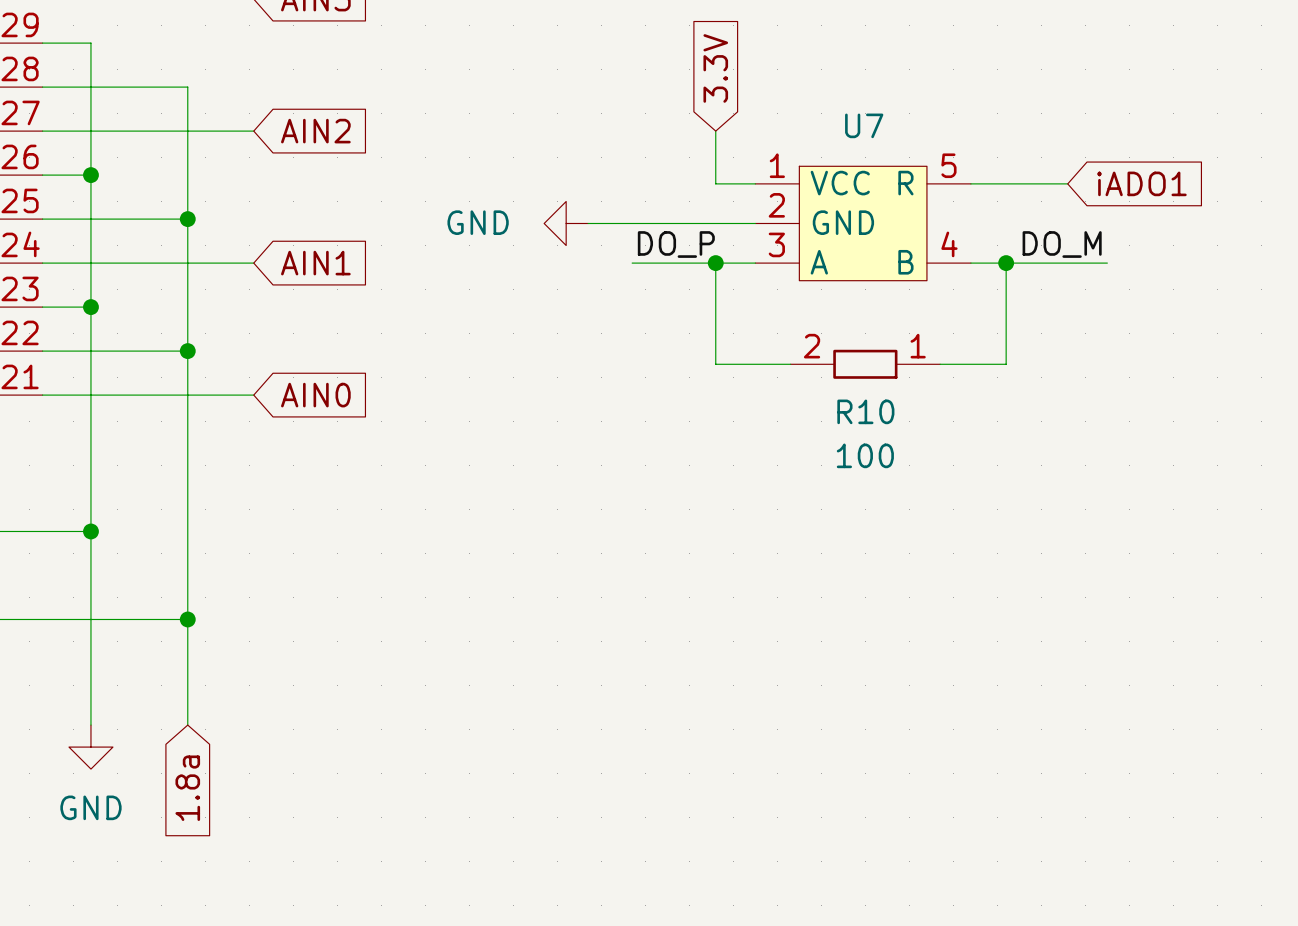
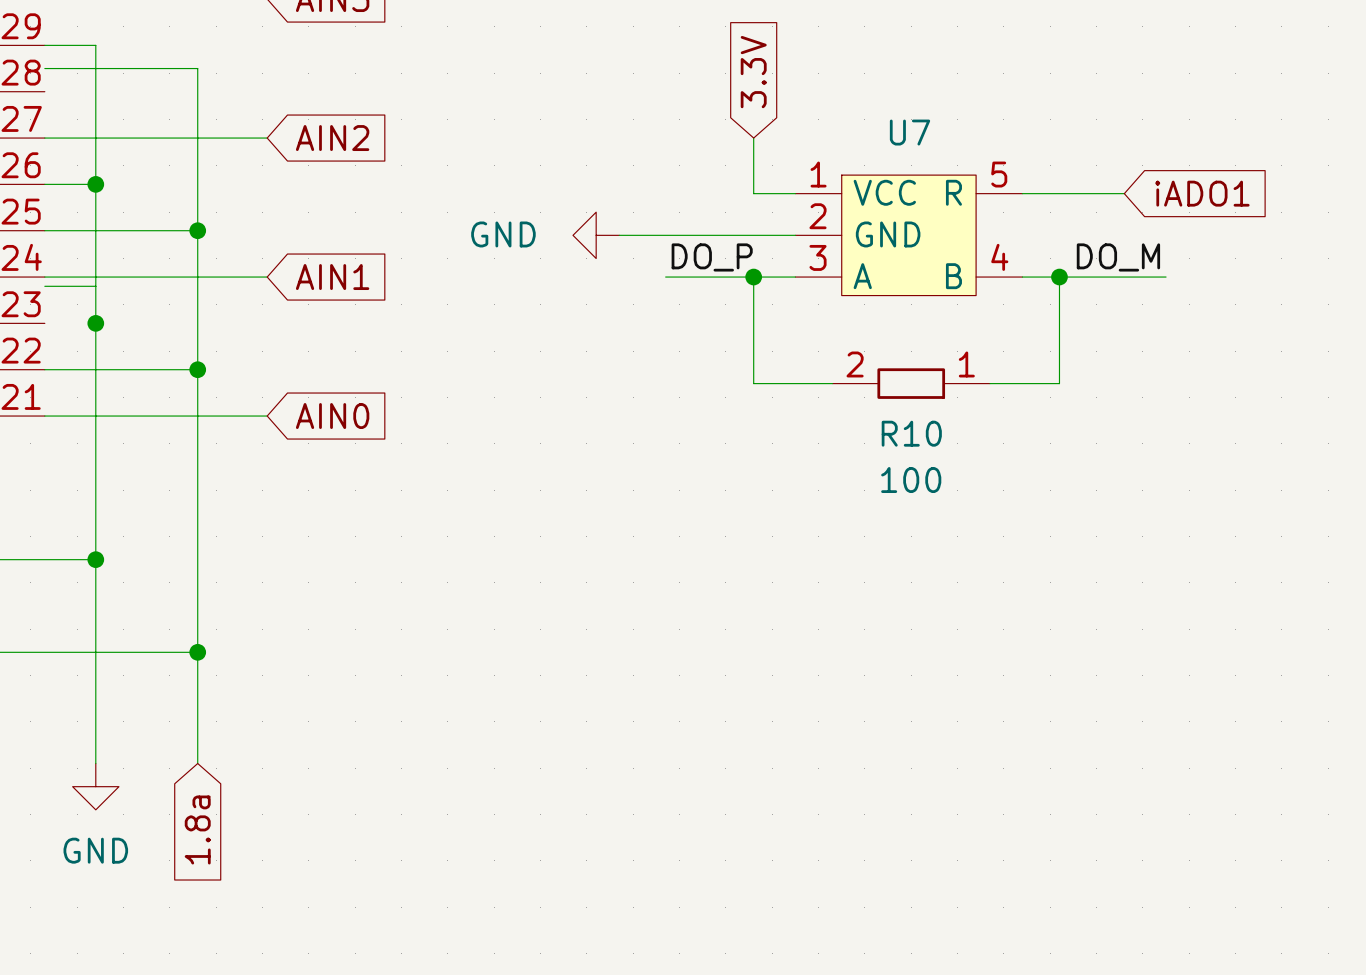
wire: (42, 87) (187, 87) -> (44, 68) (197, 68) (197, 91)
wire: (42, 307) (90, 307) -> (44, 286) (95, 286)

